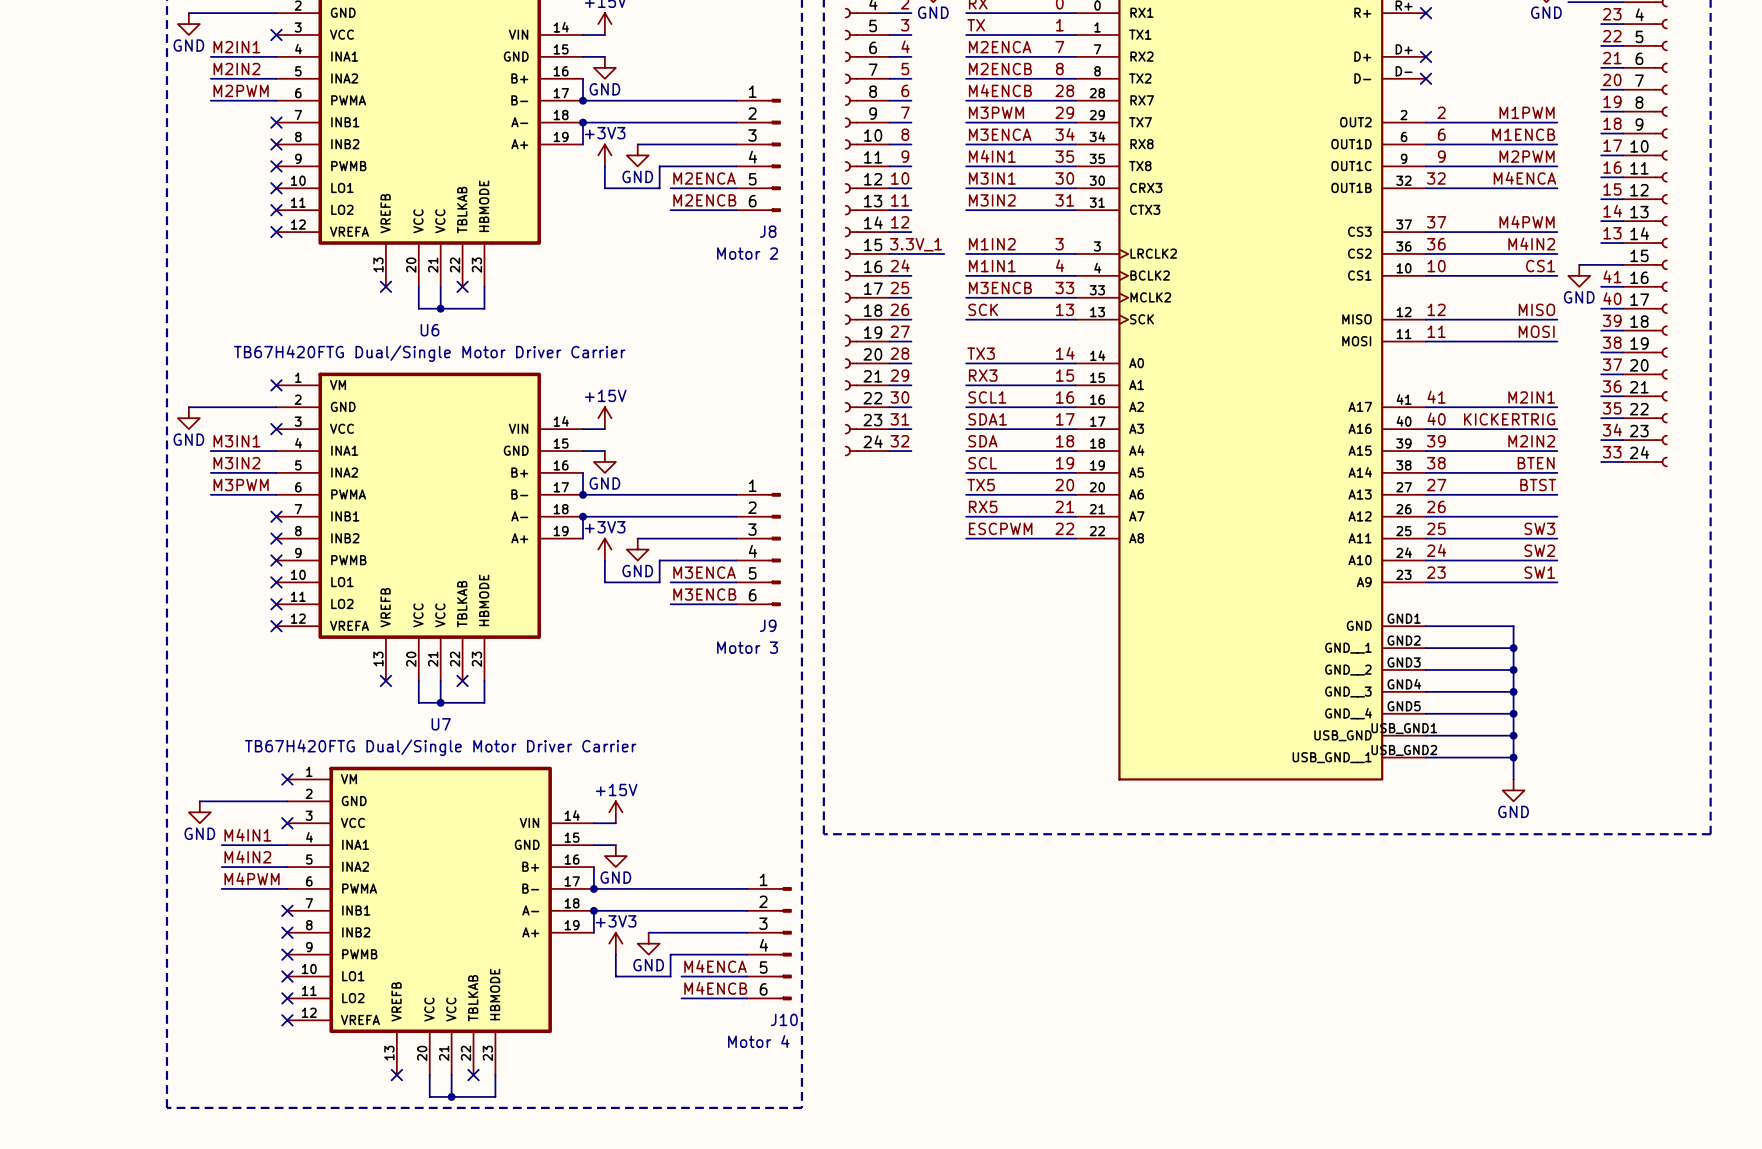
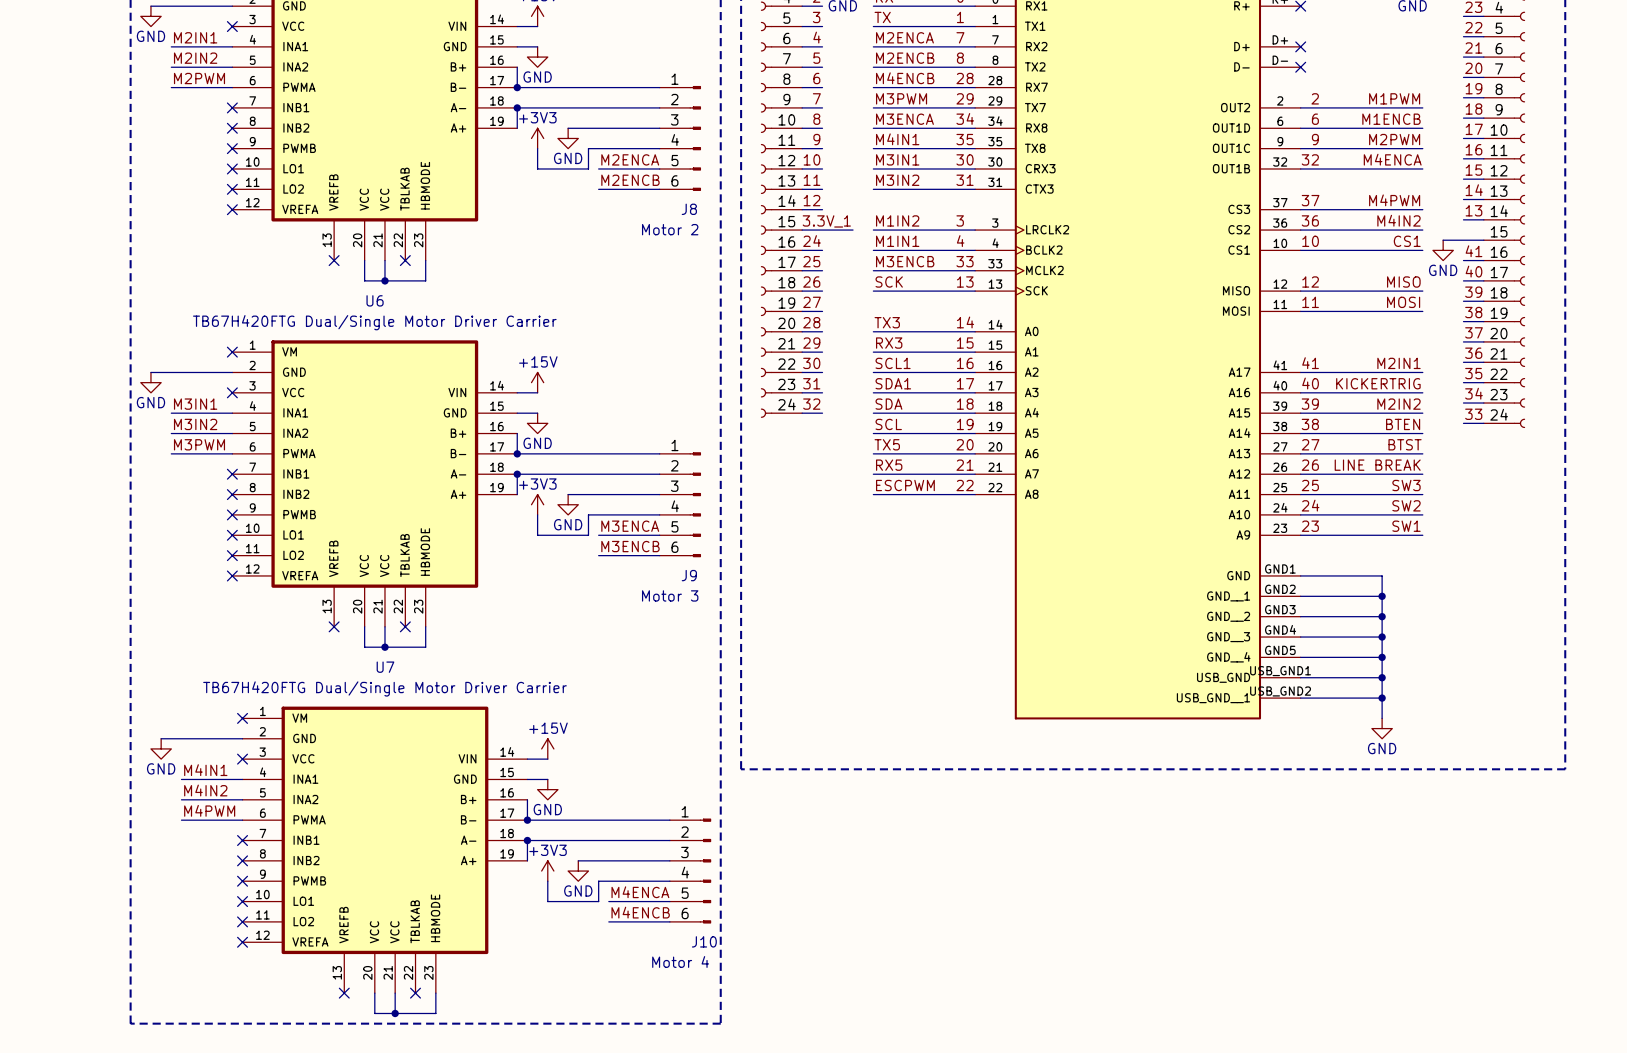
label: none -> LINE BREAK (1377, 465)

